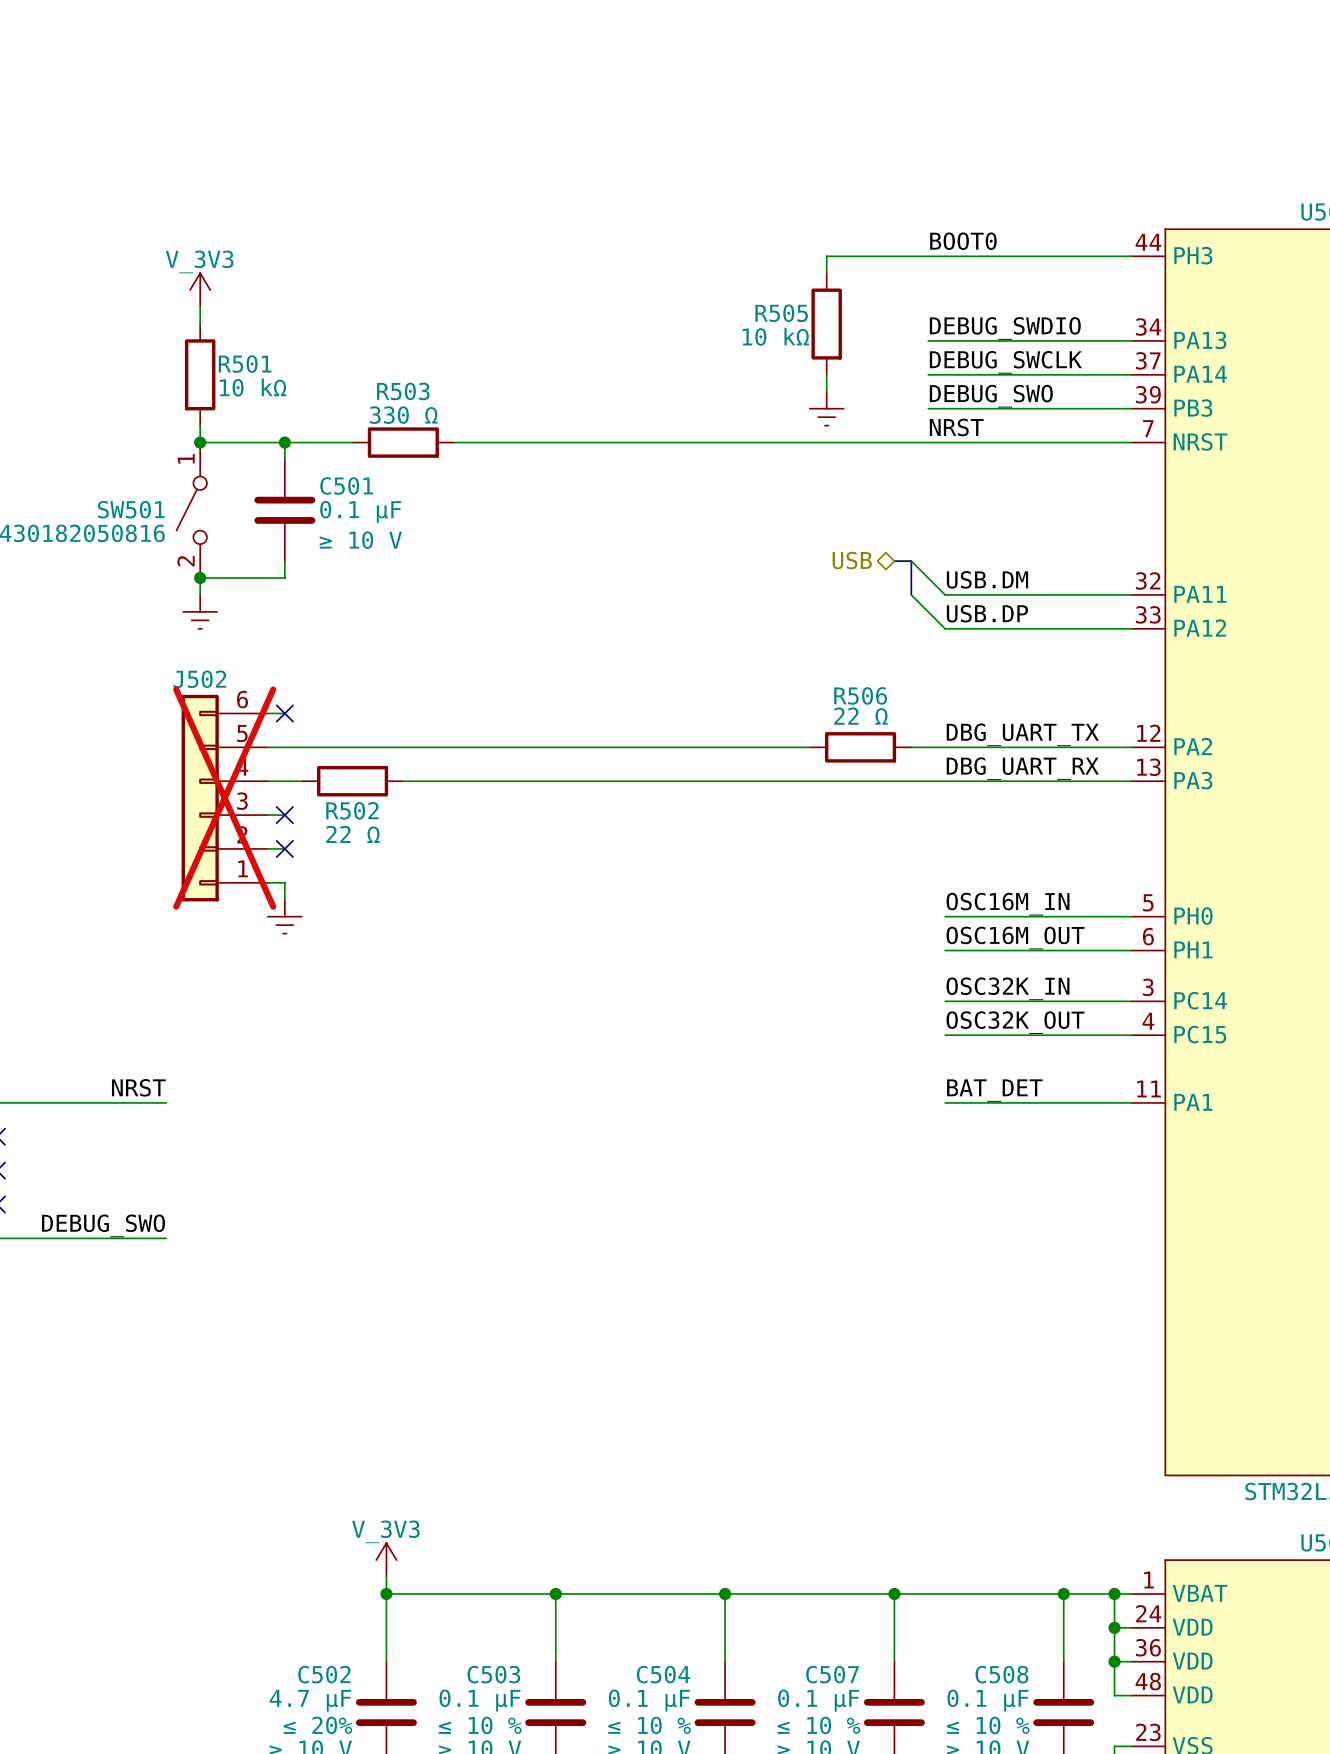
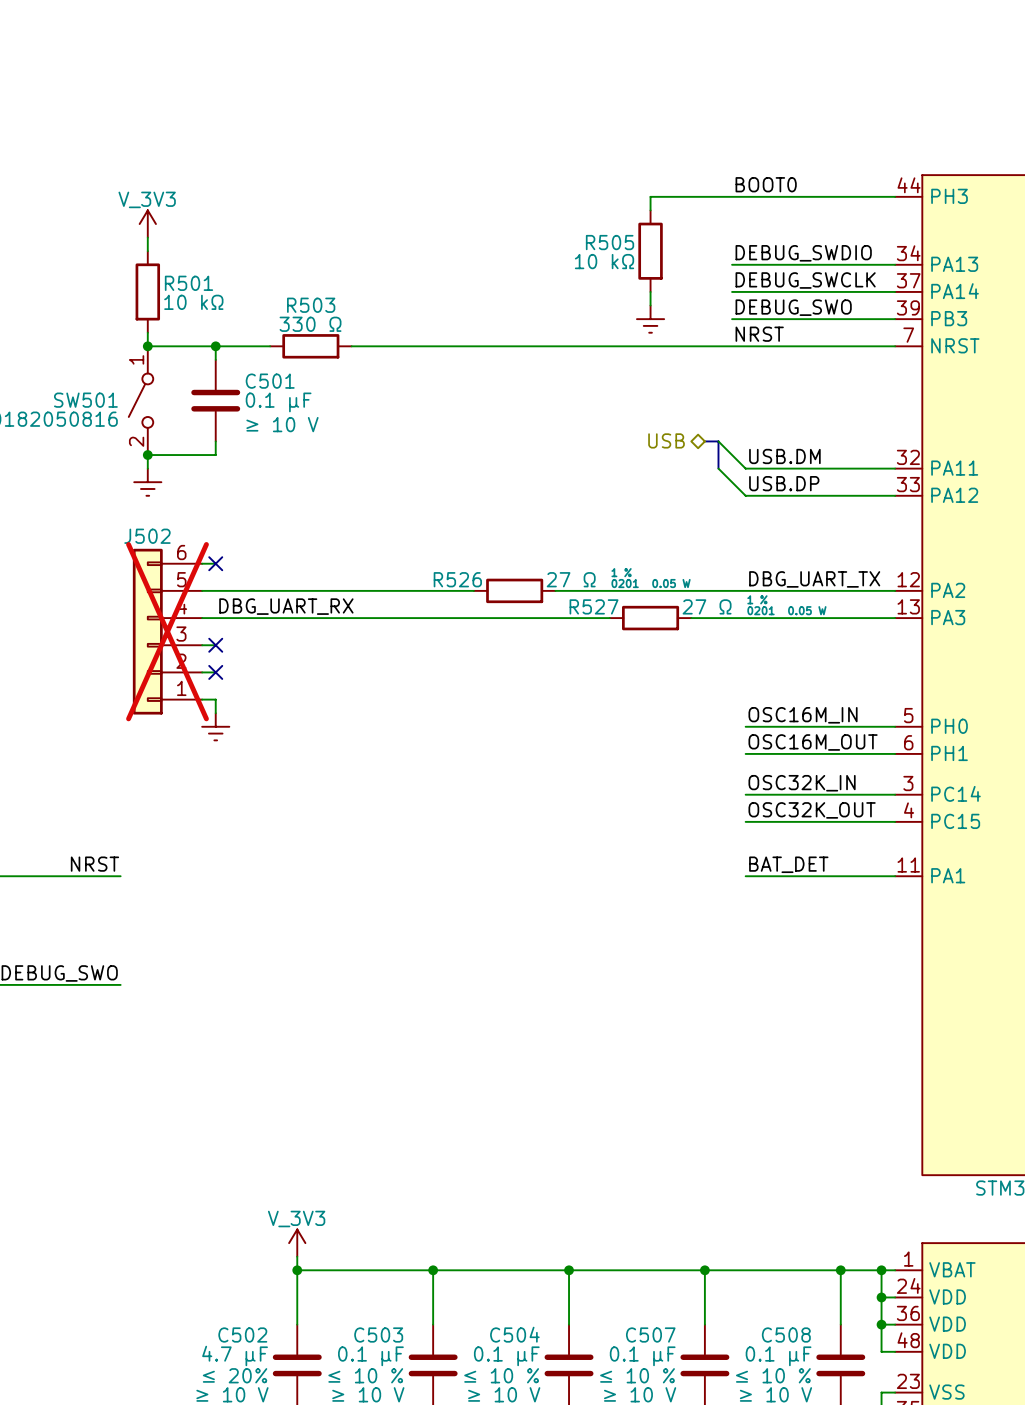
wire: (606, 747) (708, 747) -> (229, 618) (310, 618)
R526: none -> 27 Ω (514, 590)
R506: 22 Ω (860, 747) -> none
label: none -> DBG_UART_RX (286, 606)
label: DBG_UART_RX (1022, 768) -> none
R502: 22 Ω (352, 781) -> none
wire: (775, 781) (877, 781) -> (636, 590) (718, 590)
R527: none -> 27 Ω (650, 618)

